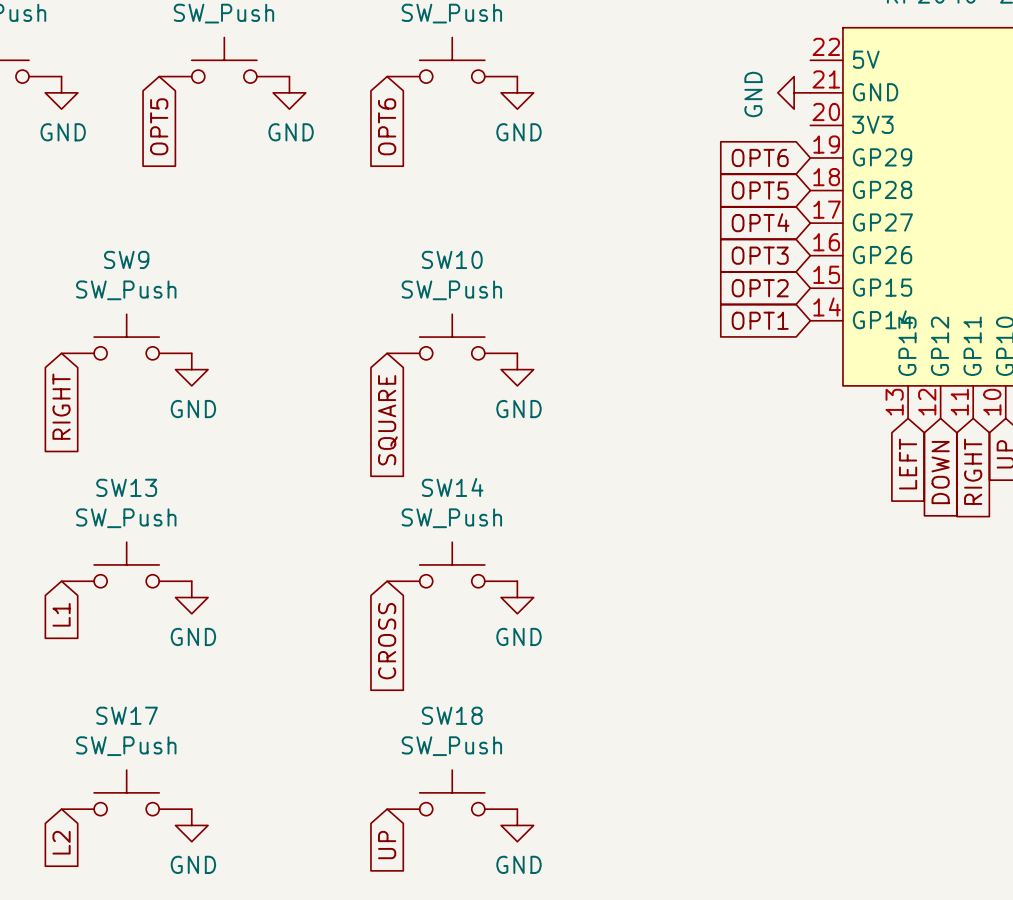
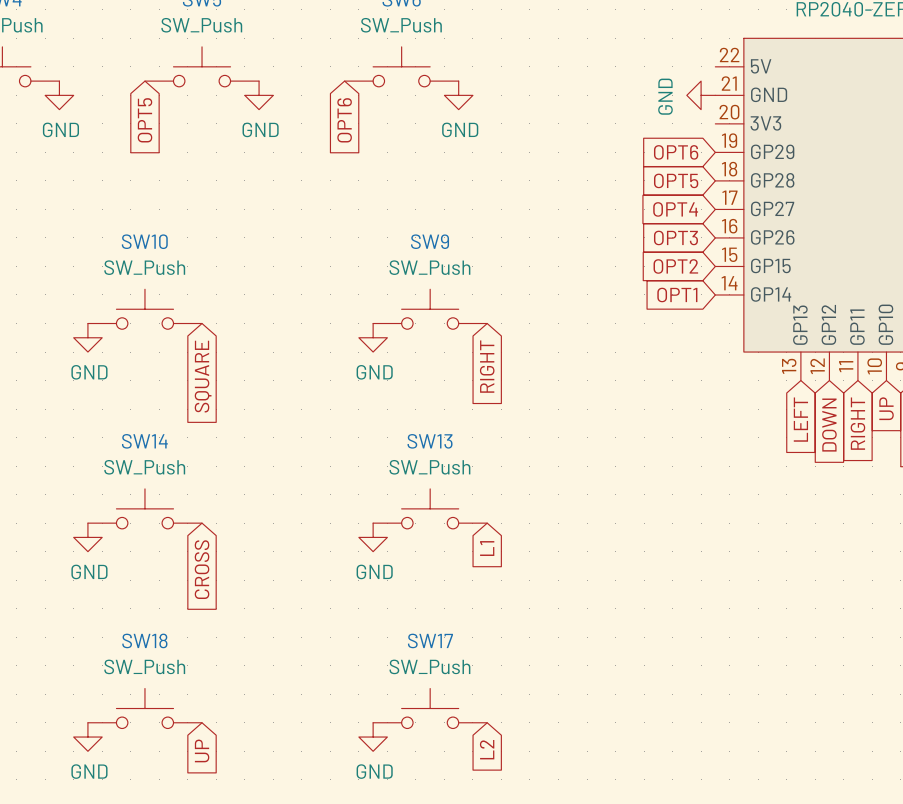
SW9 position: (126, 337) -> (430, 309)
SW10 position: (452, 337) -> (144, 309)
power symbol position: GND (191, 369) -> GND (87, 337)
power symbol position: GND (517, 369) -> GND (373, 337)
global label: RIGHT (61, 406) -> none
global label: none -> RIGHT (487, 366)
global label position: SQUARE (387, 420) -> SQUARE (203, 376)
SW13 position: (126, 564) -> (430, 508)
SW14 position: (452, 564) -> (144, 508)
power symbol position: GND (191, 597) -> GND (87, 537)
power symbol position: GND (517, 597) -> GND (373, 537)
global label: L1 (61, 614) -> none
global label: none -> L1 (487, 548)
global label position: CROSS (387, 641) -> CROSS (202, 569)
SW17 position: (126, 792) -> (430, 708)
SW18 position: (452, 792) -> (144, 708)
power symbol position: GND (191, 825) -> GND (87, 737)
power symbol position: GND (517, 825) -> GND (373, 737)
global label: L2 (61, 842) -> none
global label: none -> L2 (487, 749)
global label position: UP (387, 845) -> UP (202, 750)

